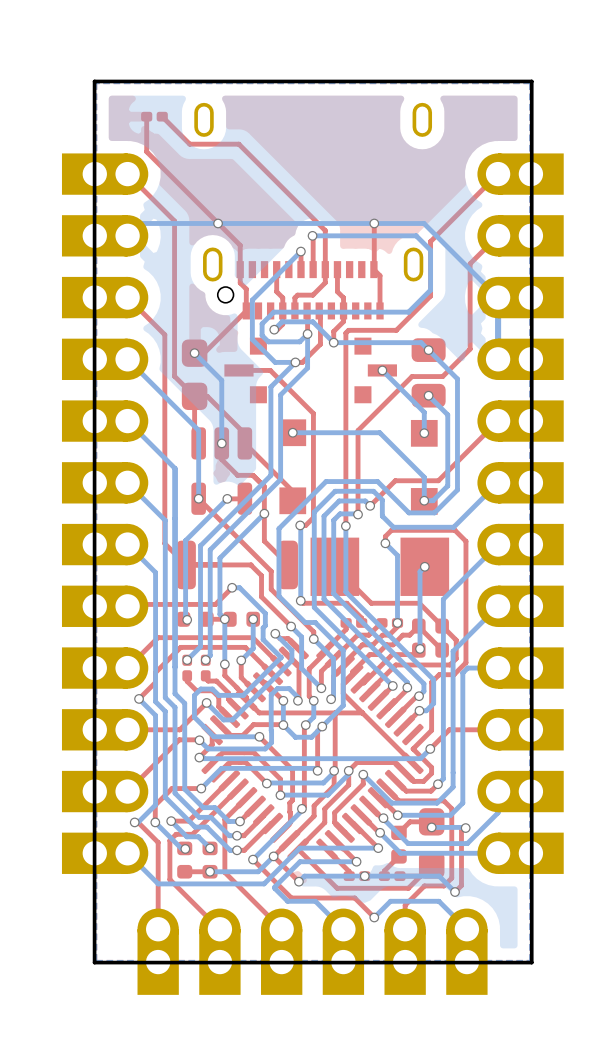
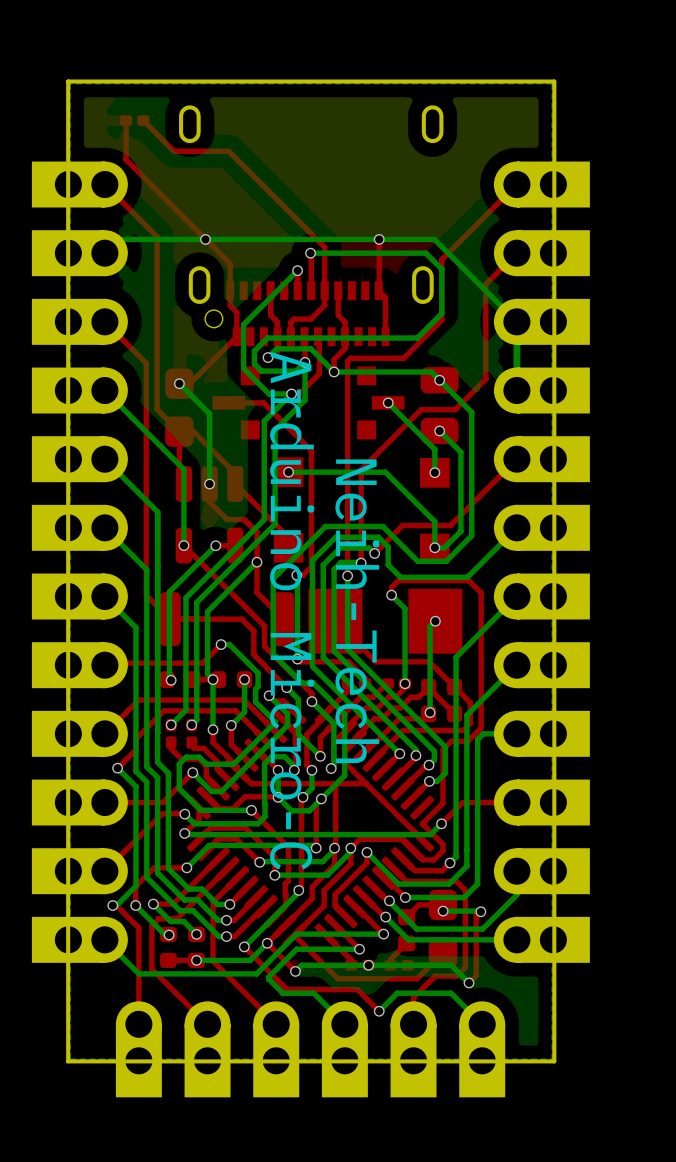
text: none -> Arduino Micro-C (292, 610)
text: none -> Neih-Tech (357, 611)

